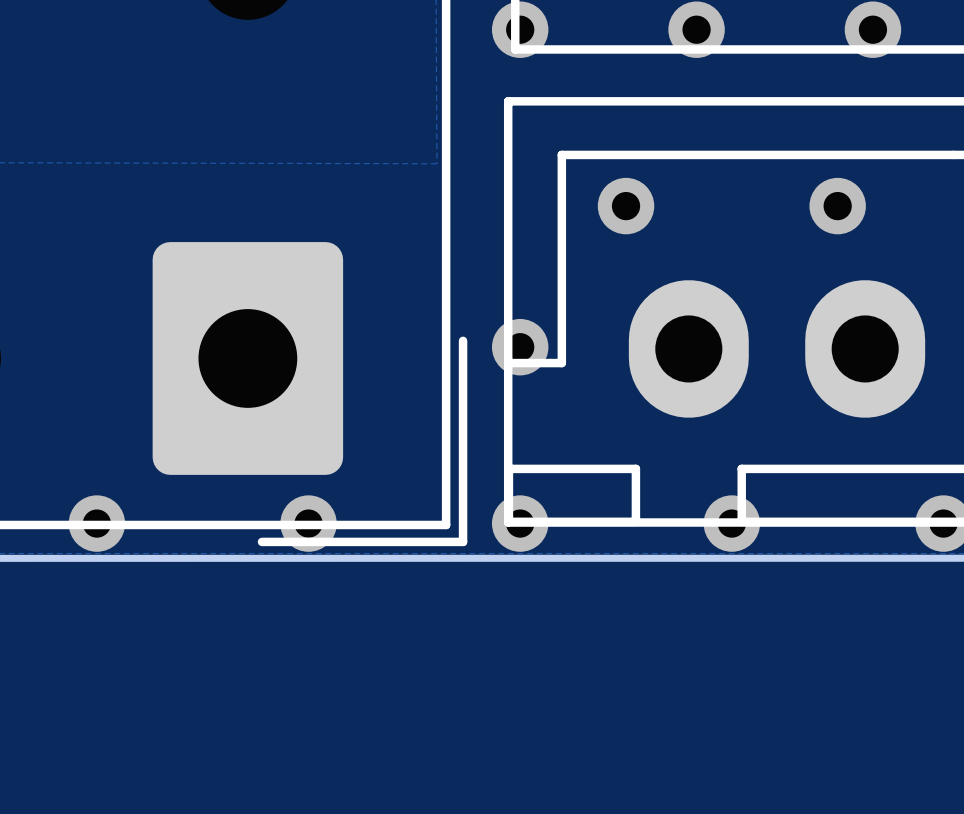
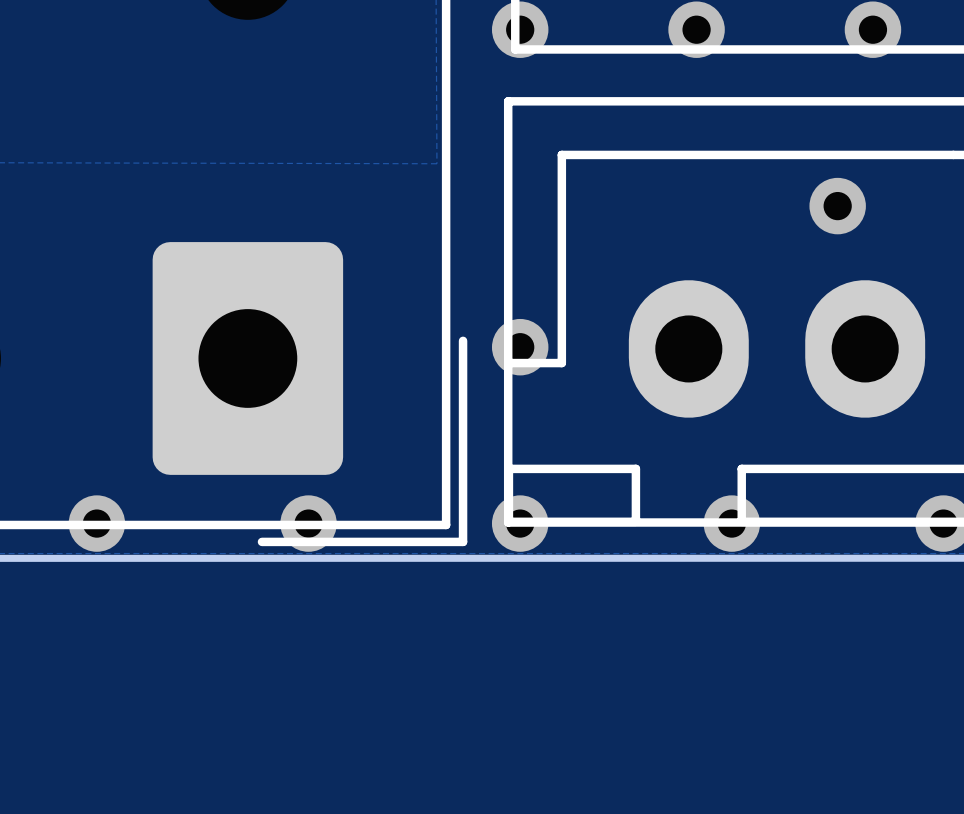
via: (626, 206) -> none

